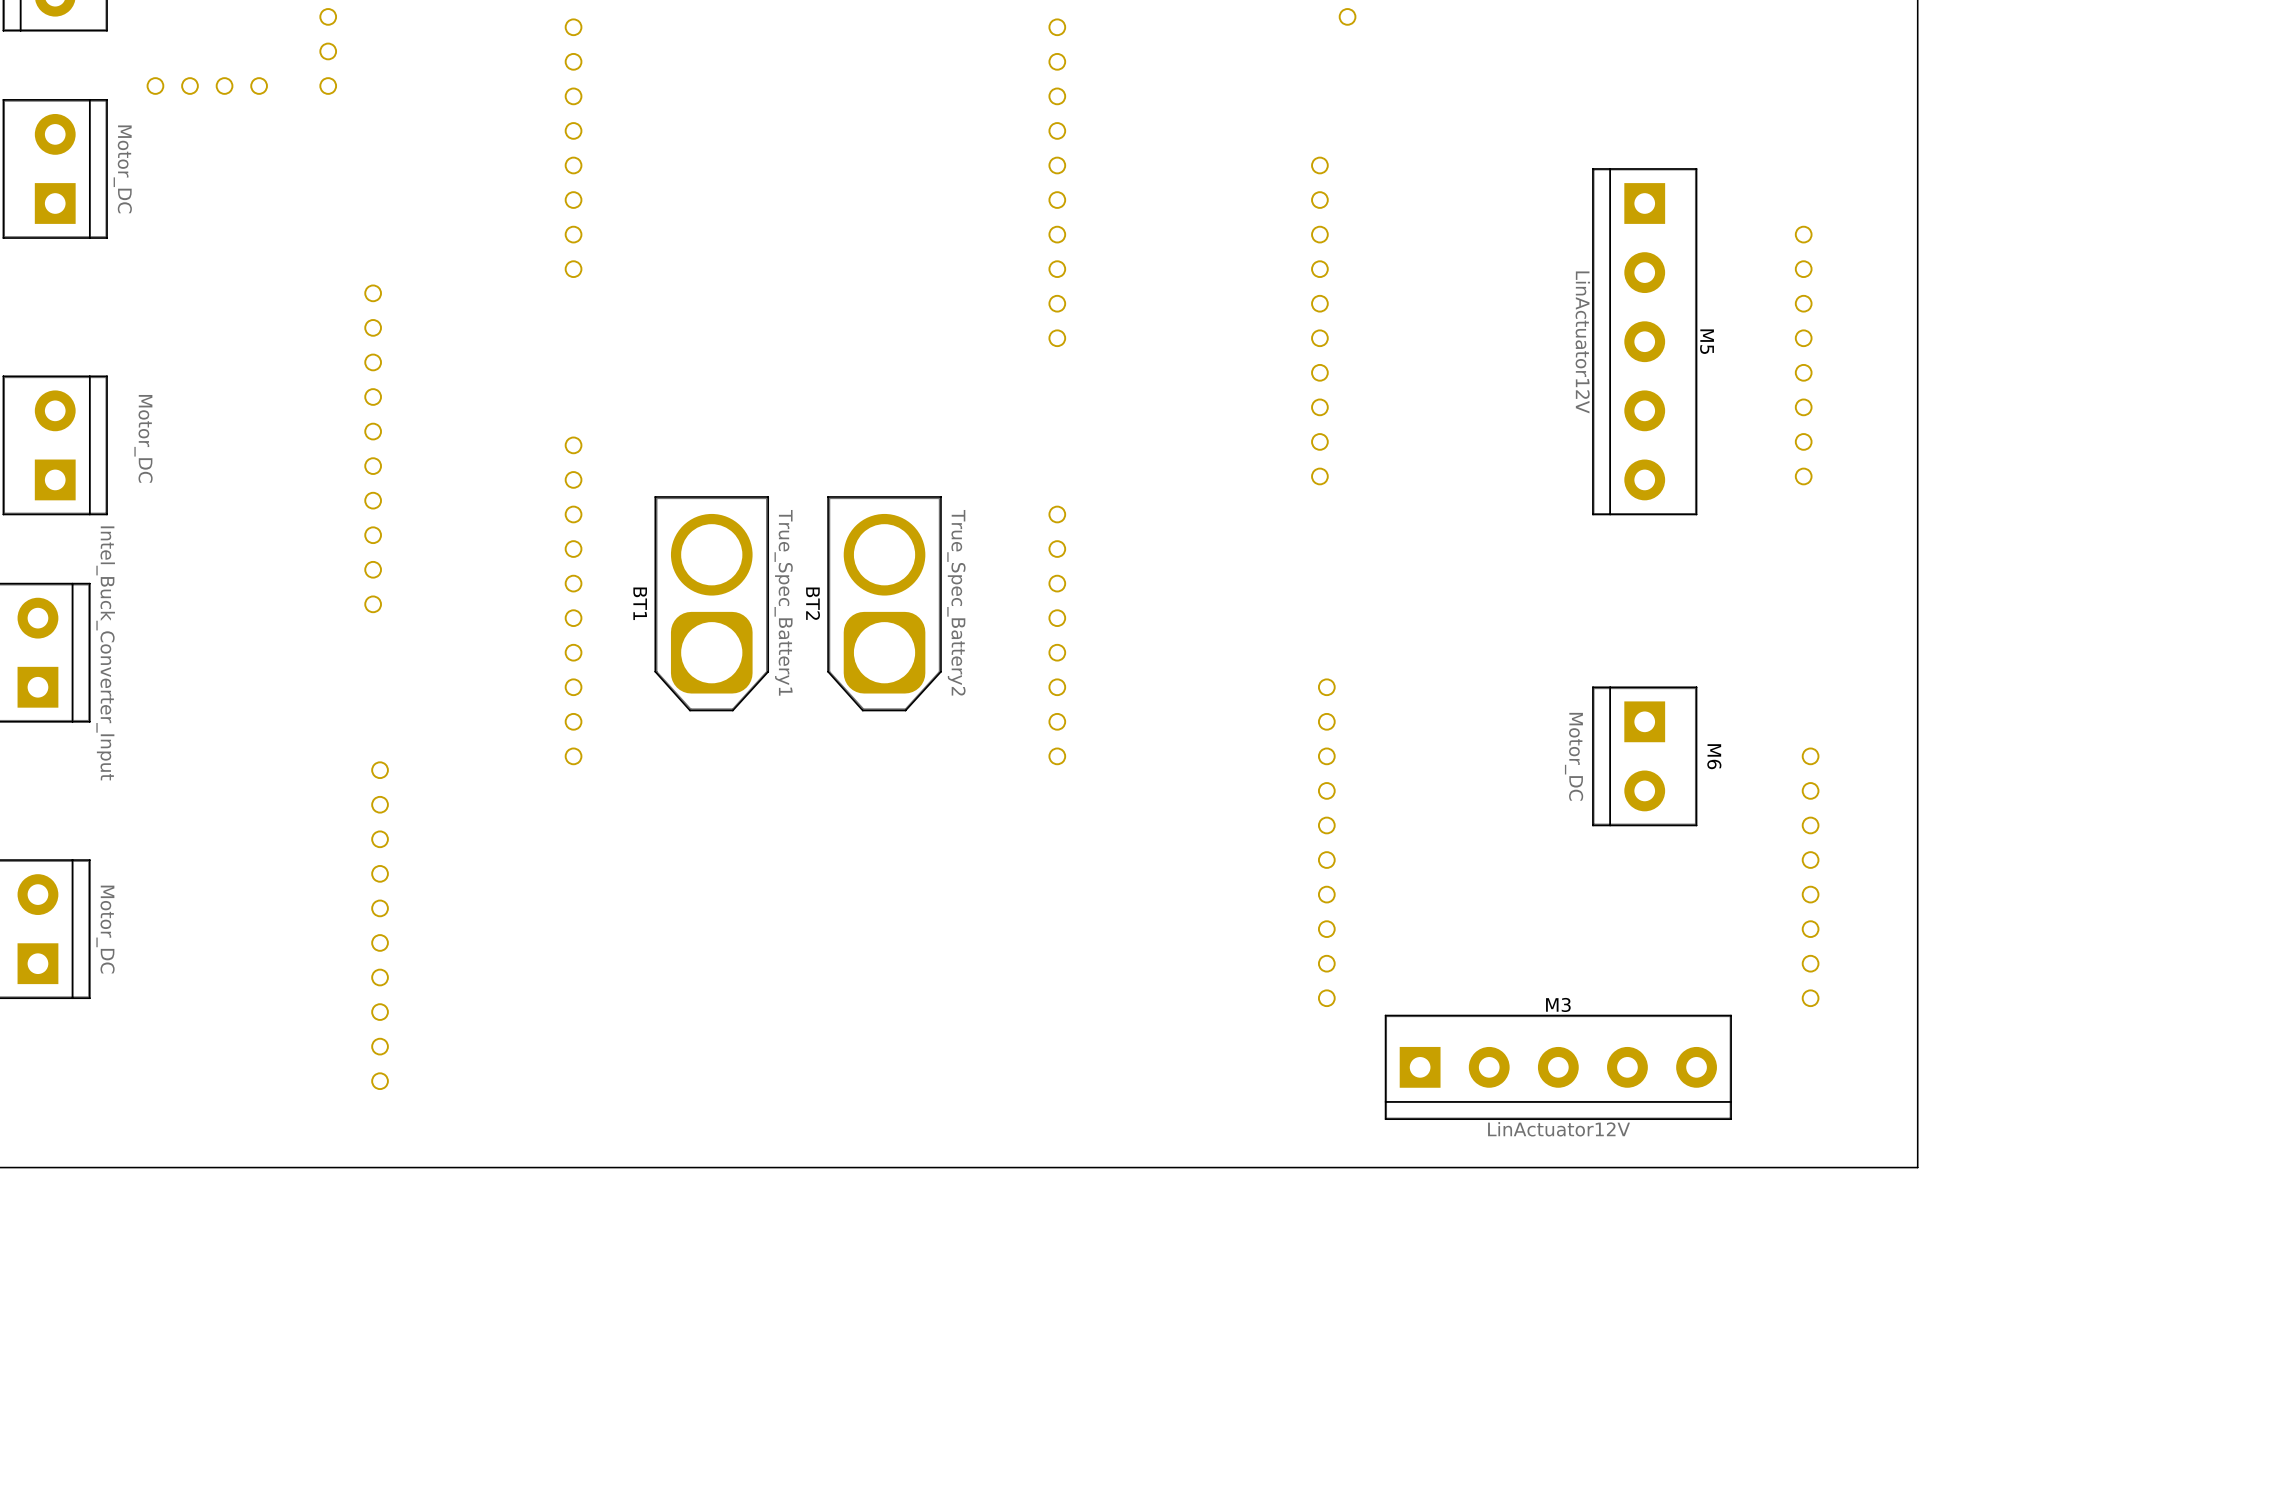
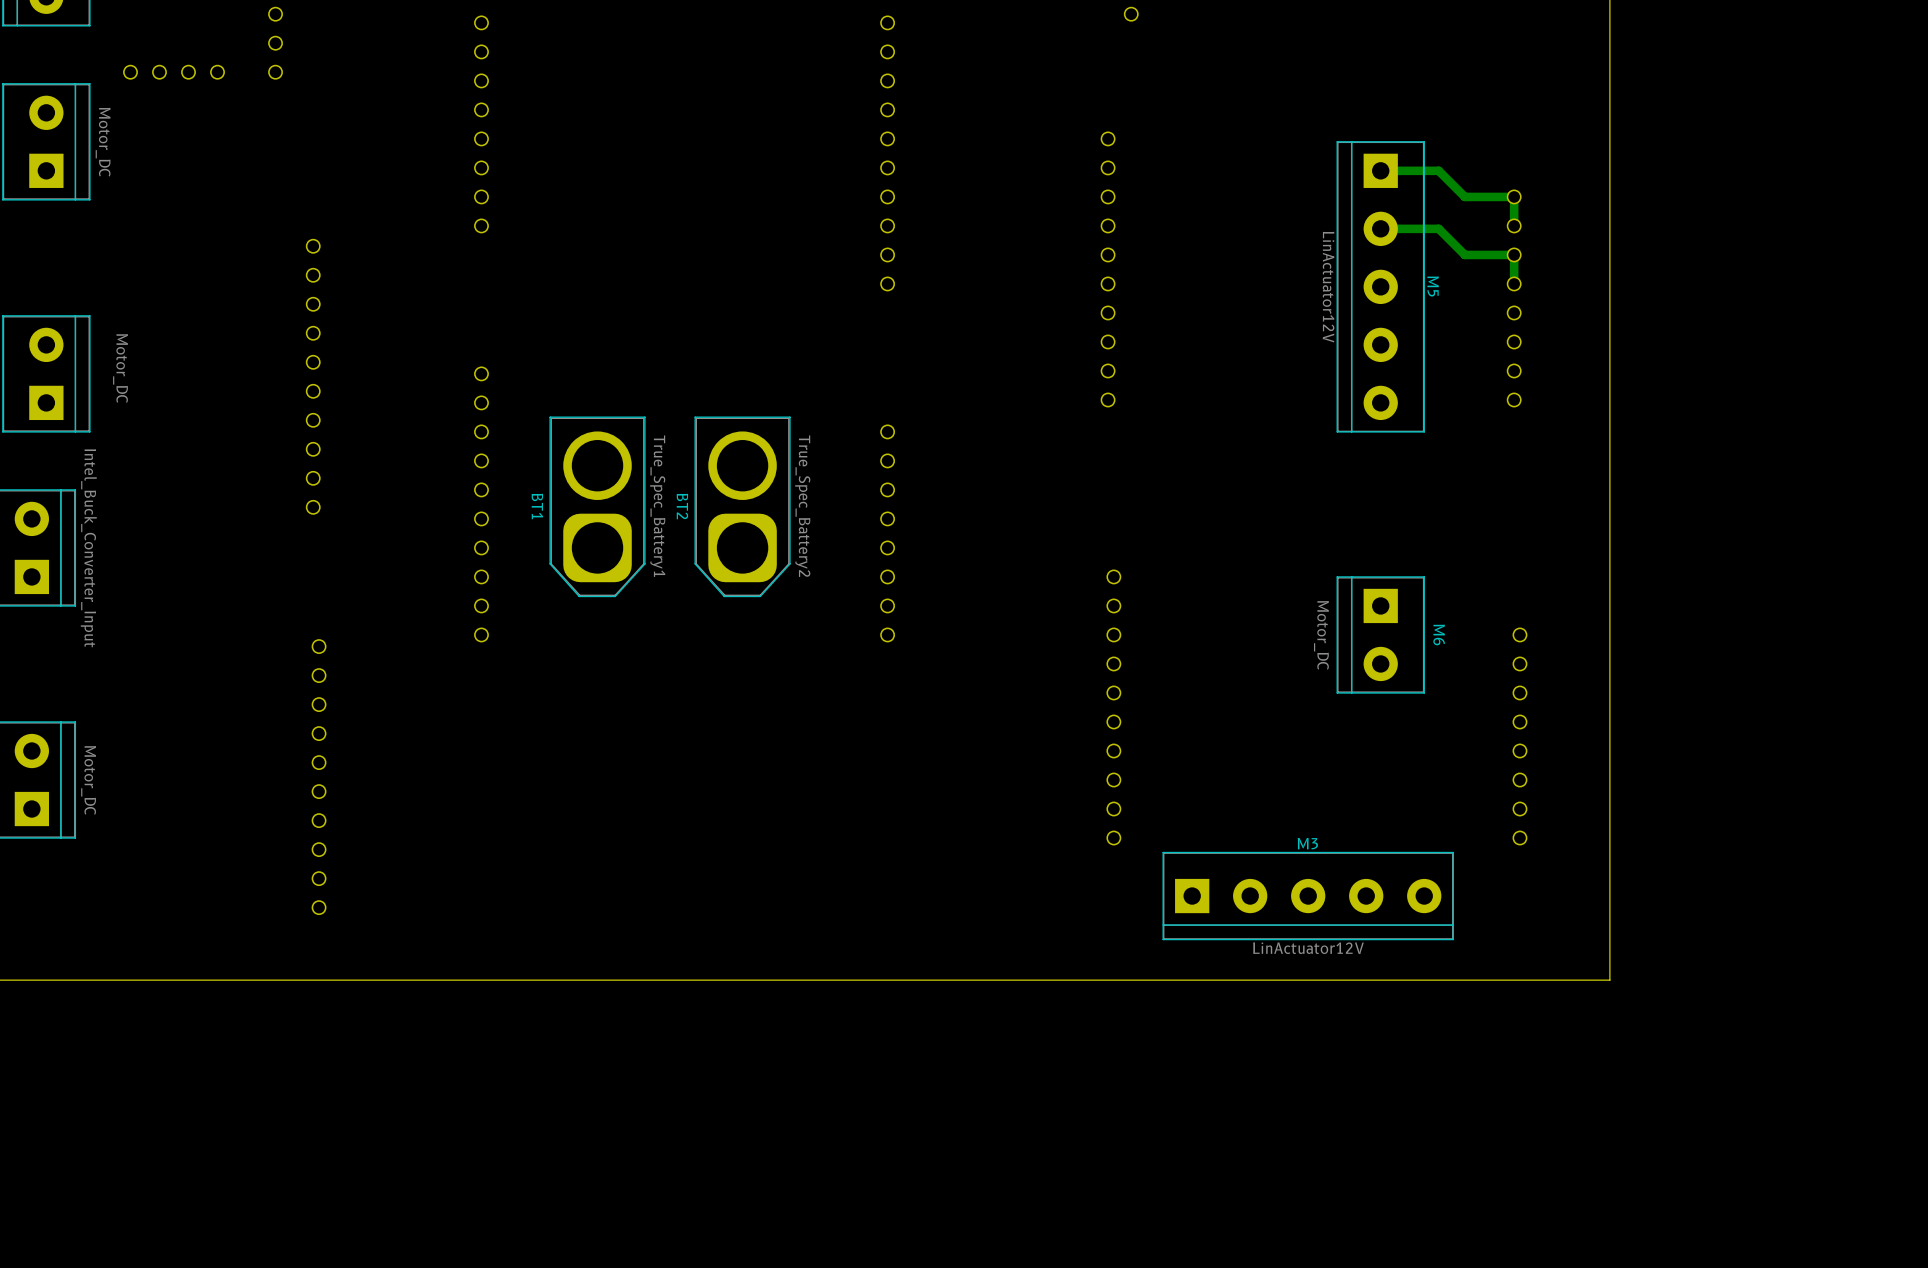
track: none -> (1380, 170) (1438, 170) (1464, 196) (1514, 196) (1514, 225)
track: none -> (1380, 228) (1438, 228) (1464, 254) (1514, 254) (1514, 283)

